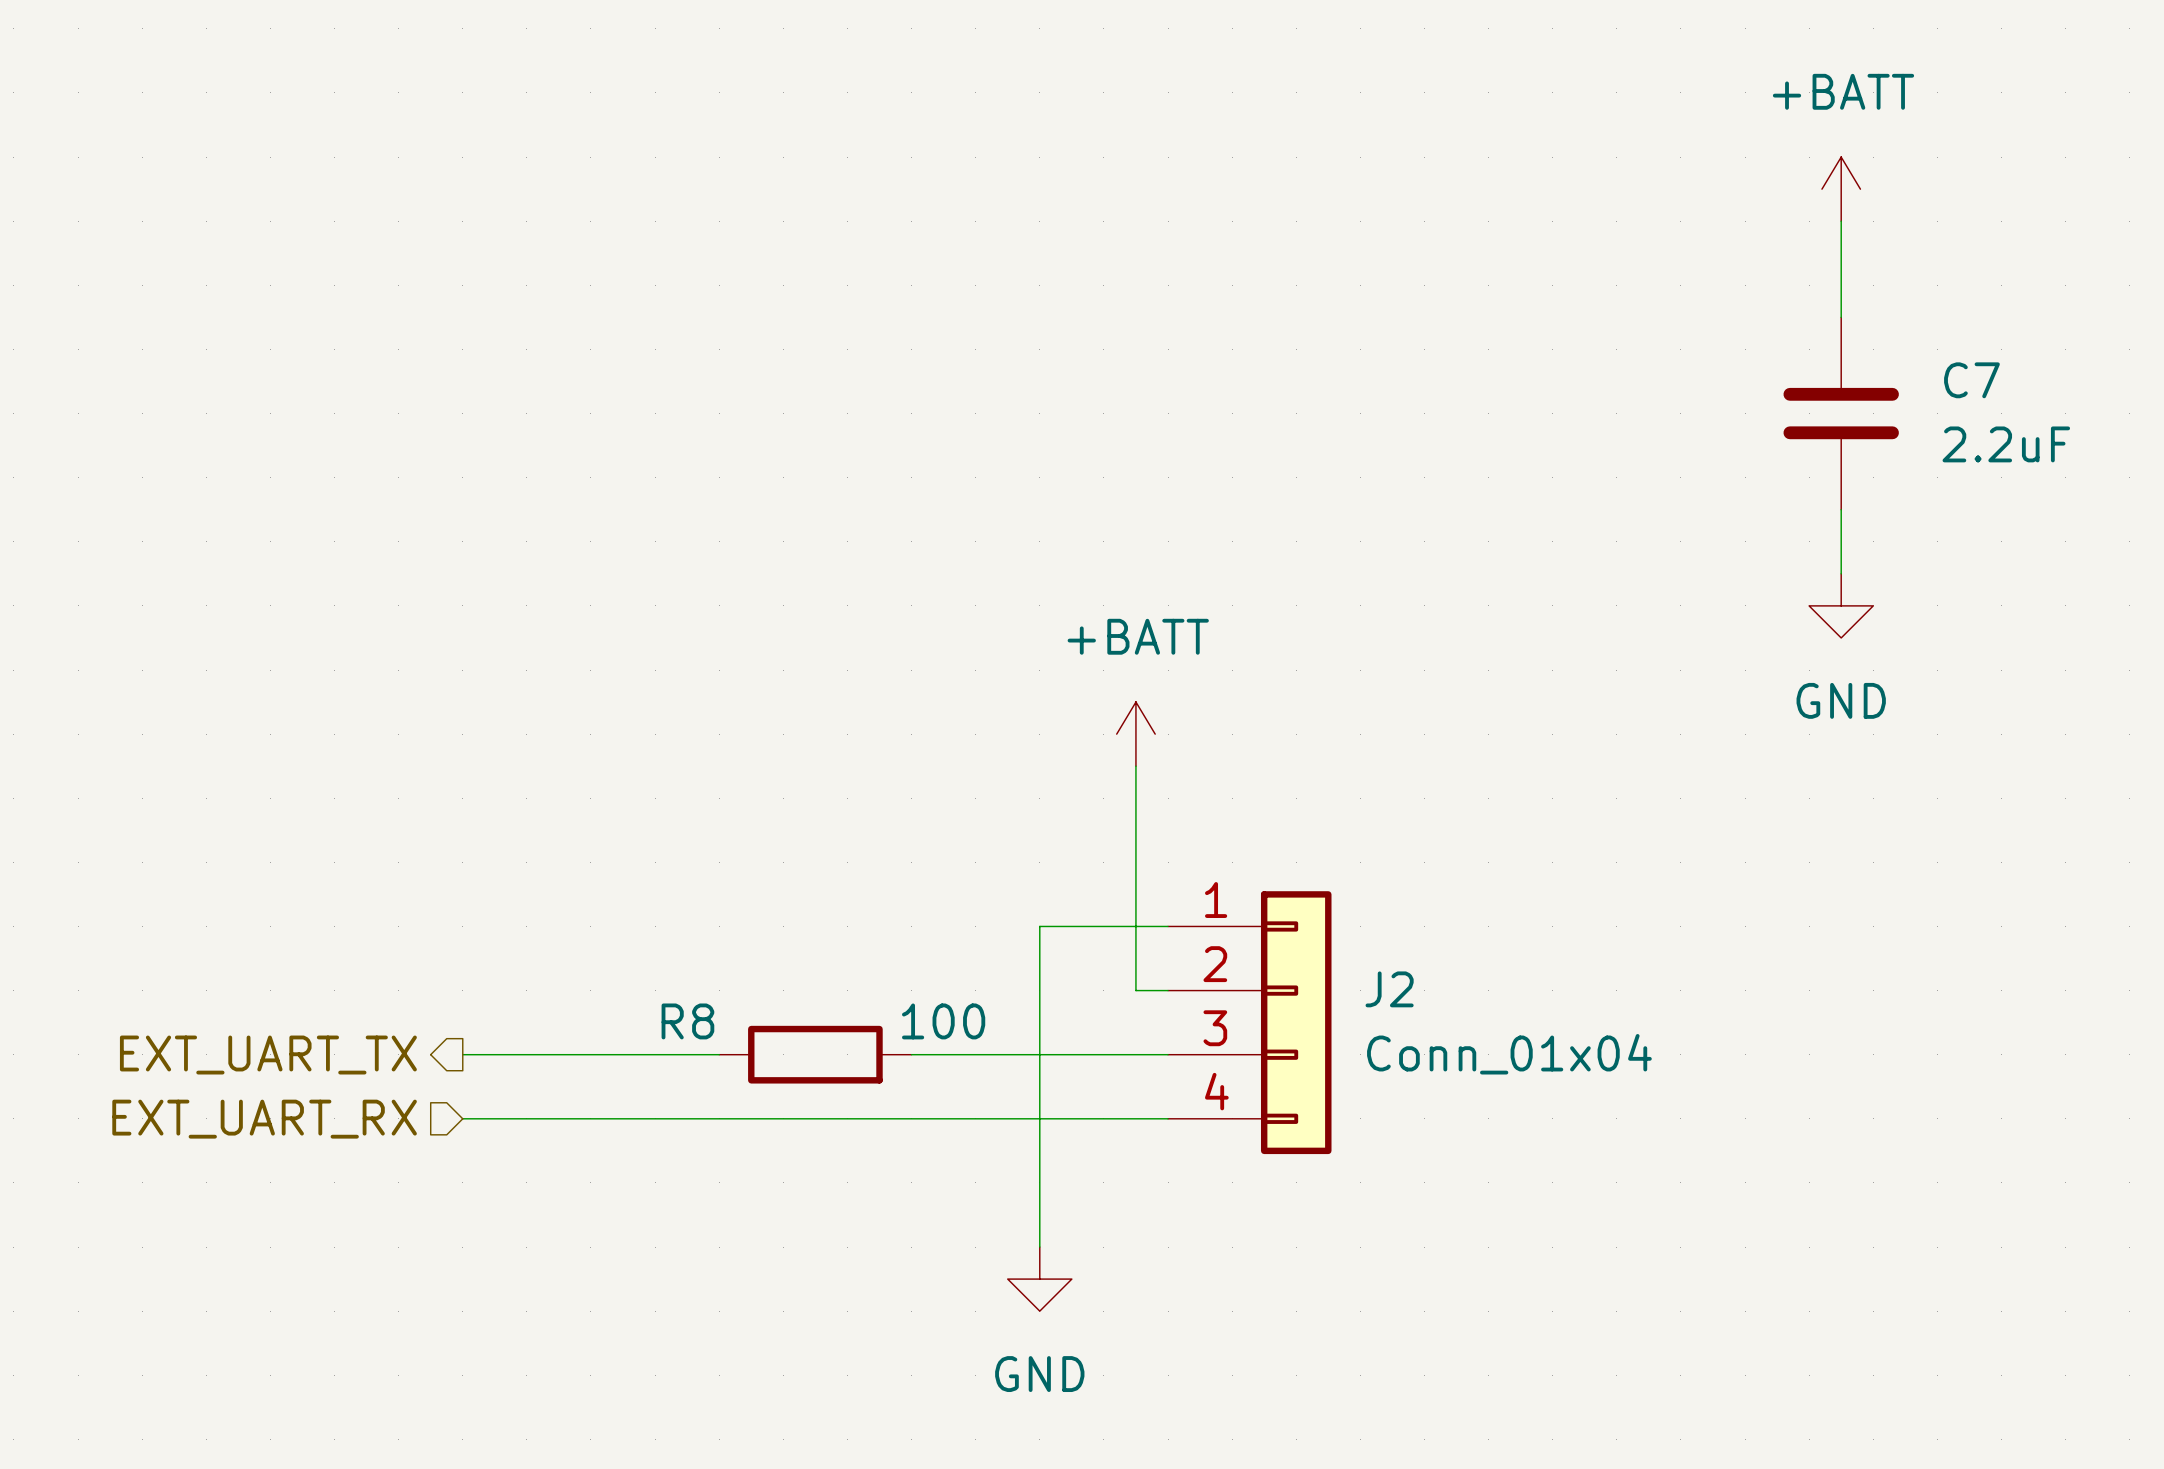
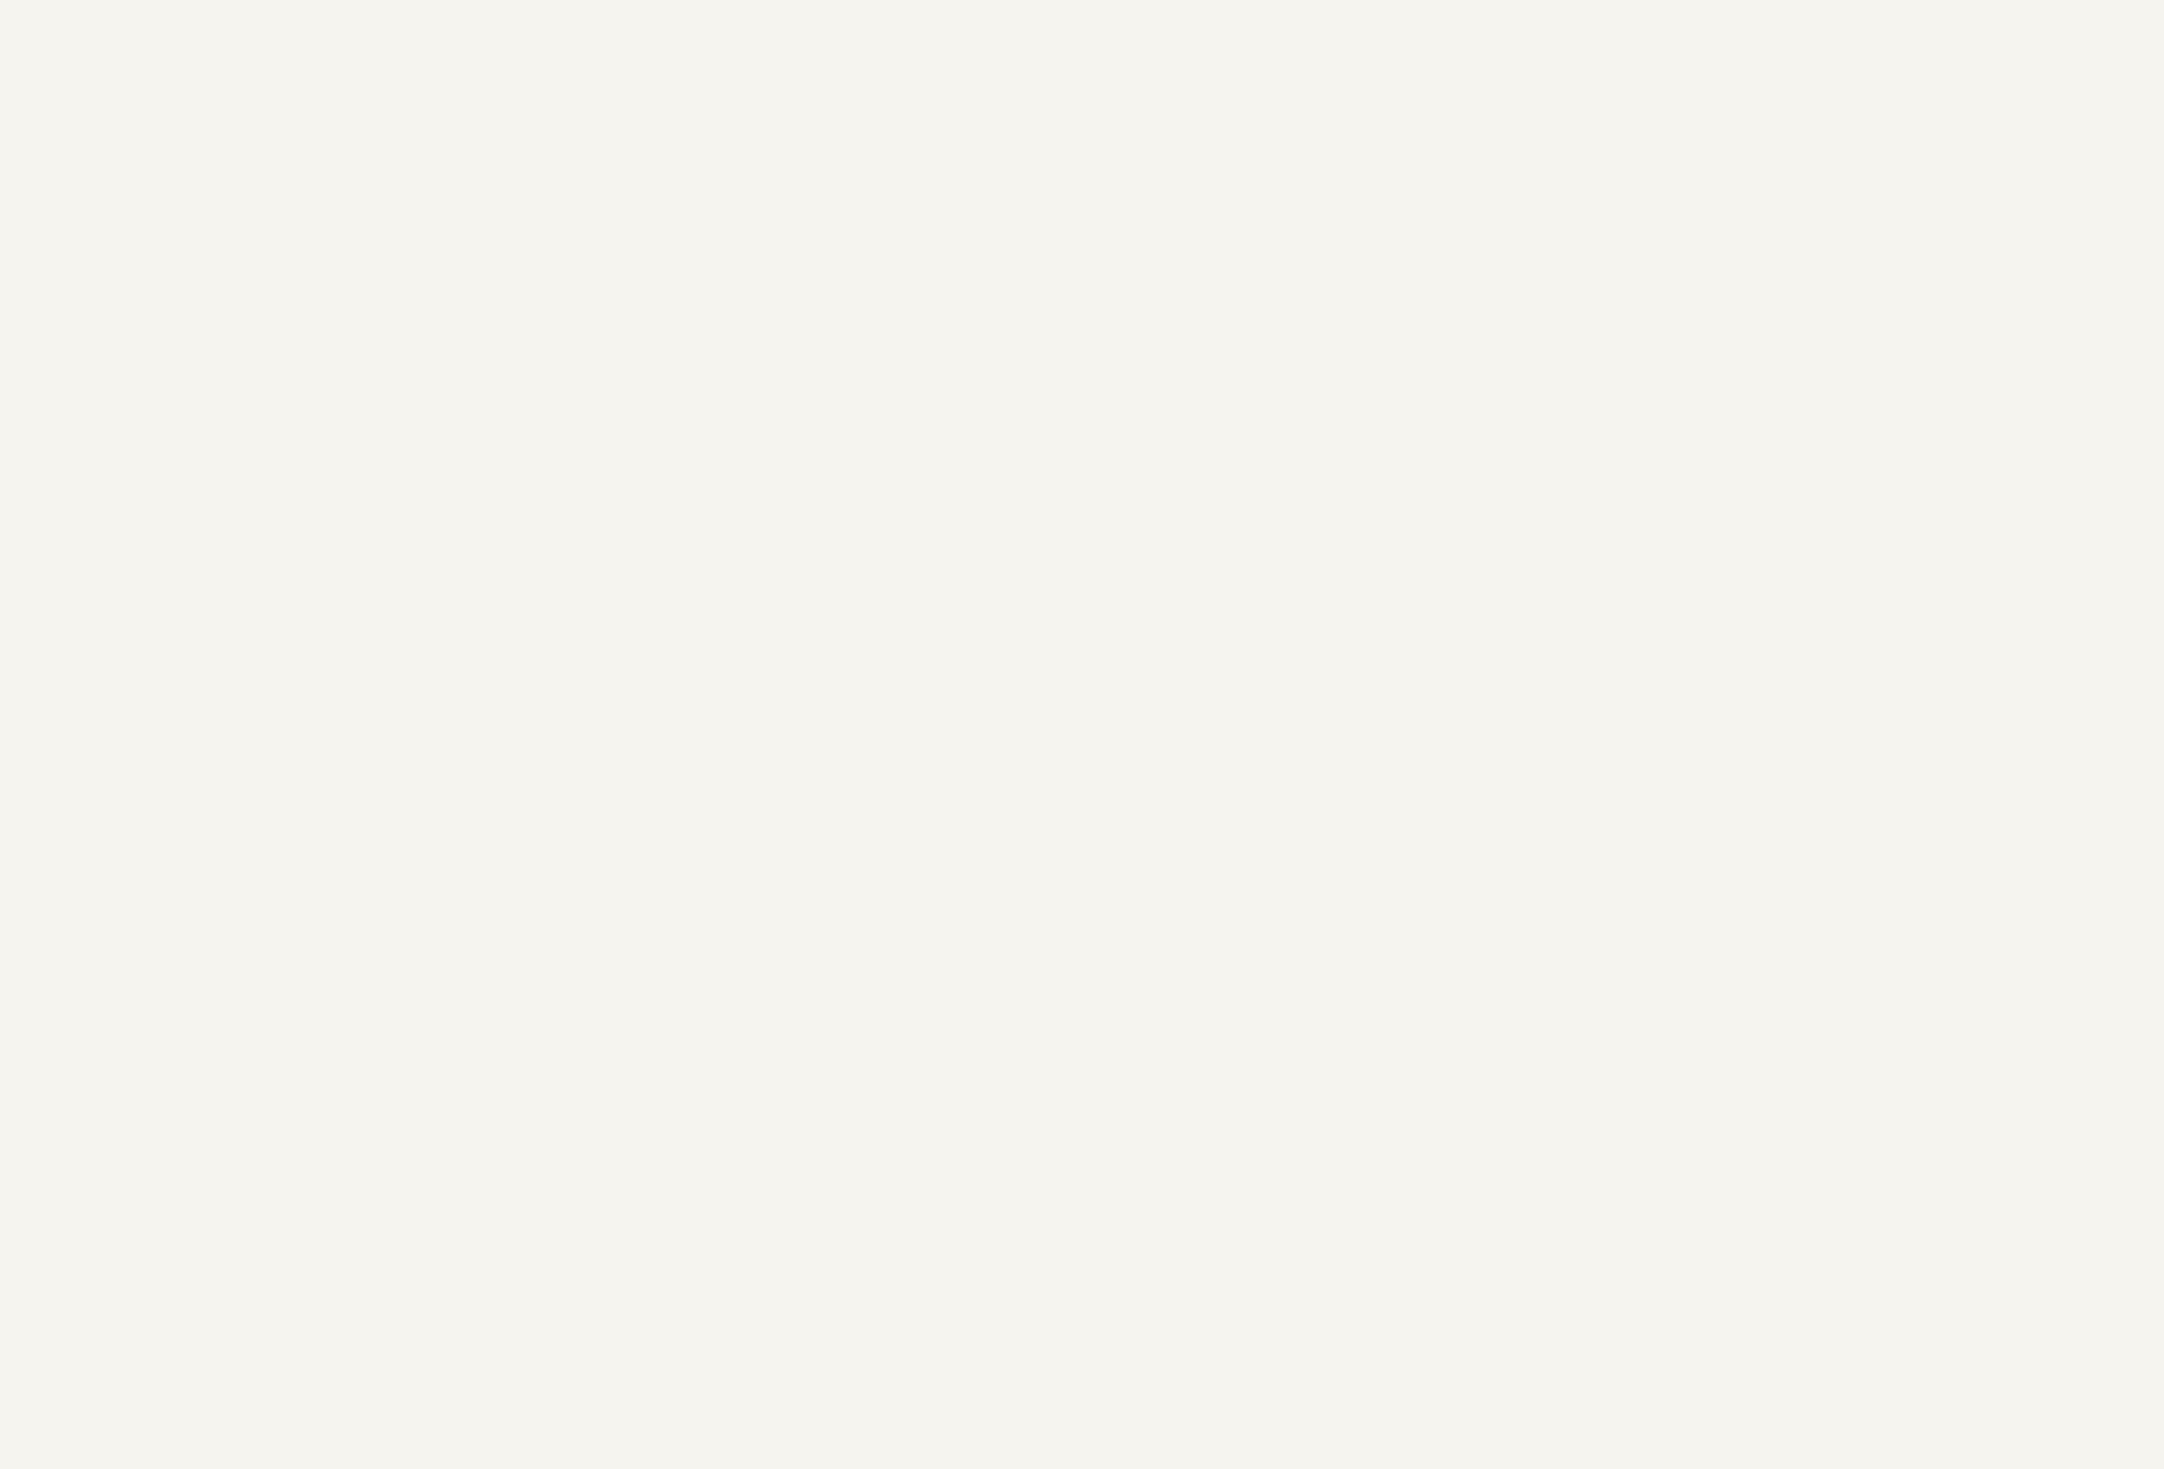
power symbol: +BATT (1841, 189) -> none
wire: (1841, 221) (1841, 317) -> none
C7: 2.2uF (1841, 413) -> none
wire: (1841, 509) (1841, 573) -> none
power symbol: GND (1841, 605) -> none
power symbol: +BATT (1135, 734) -> none
wire: (1135, 766) (1135, 990) (1168, 990) -> none
wire: (1168, 926) (1039, 926) (1039, 1247) -> none
J2: Conn_01x04 (1249, 1022) -> none
wire: (462, 1054) (719, 1054) -> none
R8: 100 (815, 1054) -> none
wire: (911, 1054) (1168, 1054) -> none
hierarchical label: EXT_UART_TX (268, 1055) -> none
wire: (462, 1118) (1168, 1118) -> none
hierarchical label: EXT_UART_RX (264, 1119) -> none
power symbol: GND (1039, 1279) -> none

